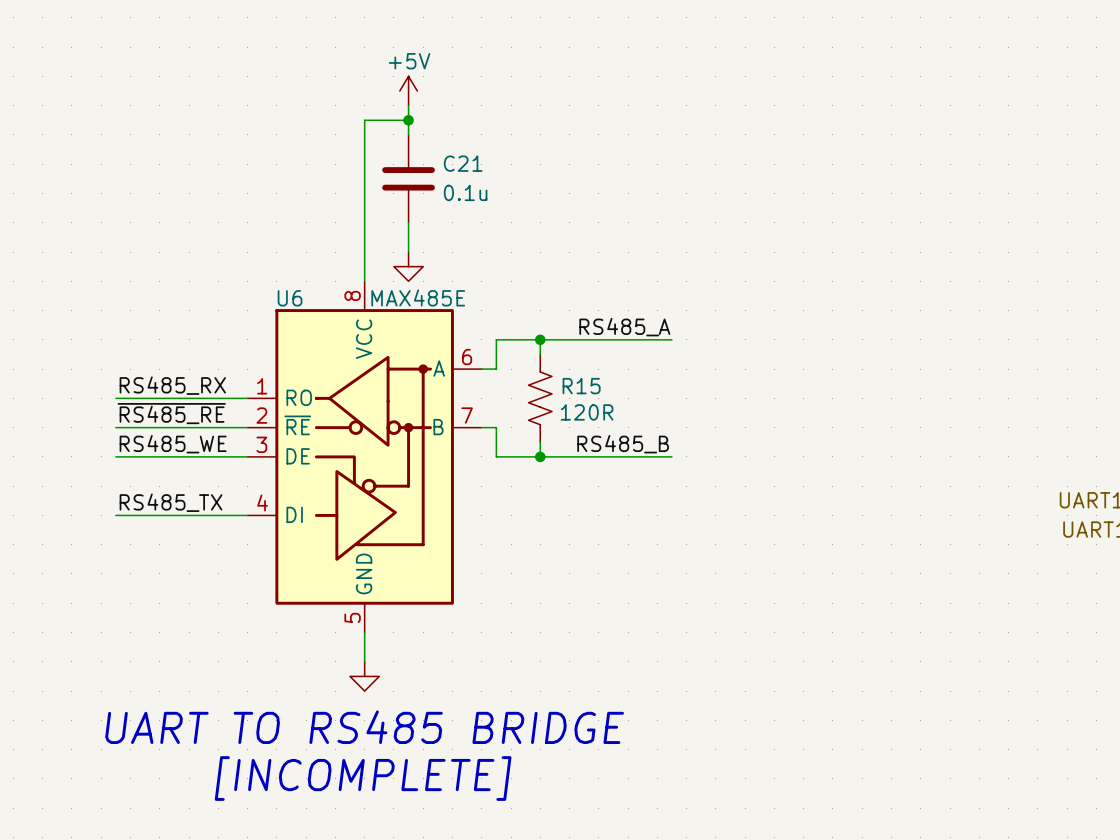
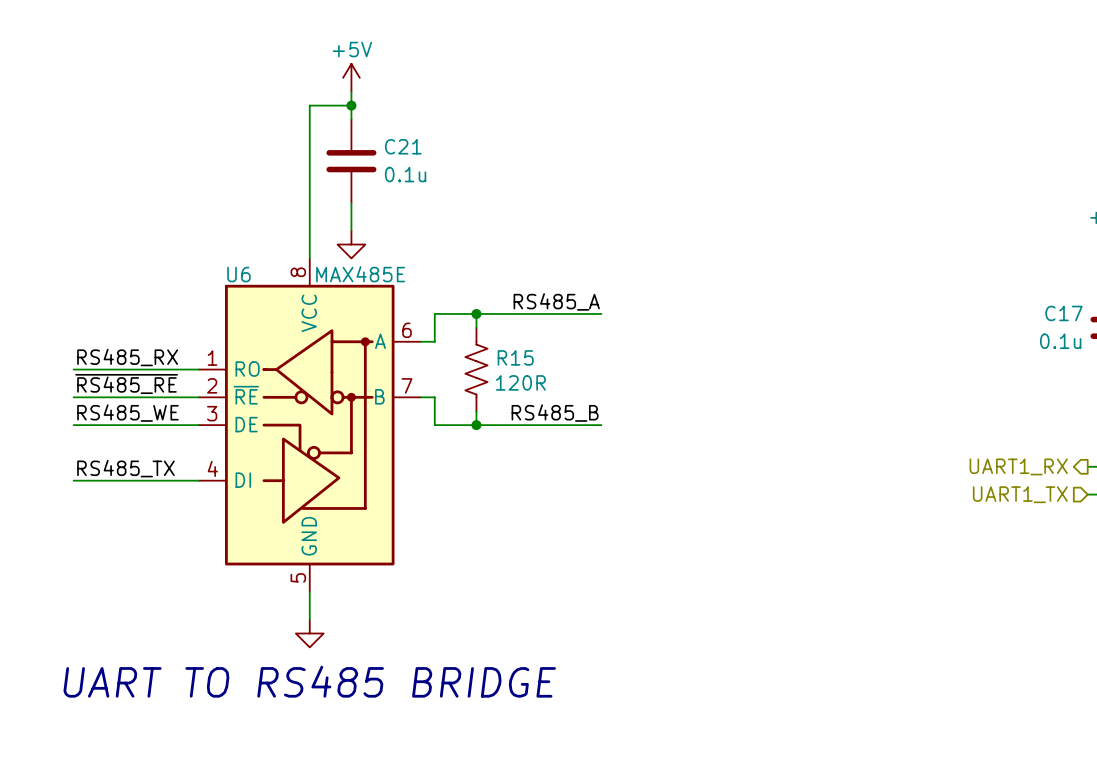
text: [INCOMPLETE] (363, 778) -> none

